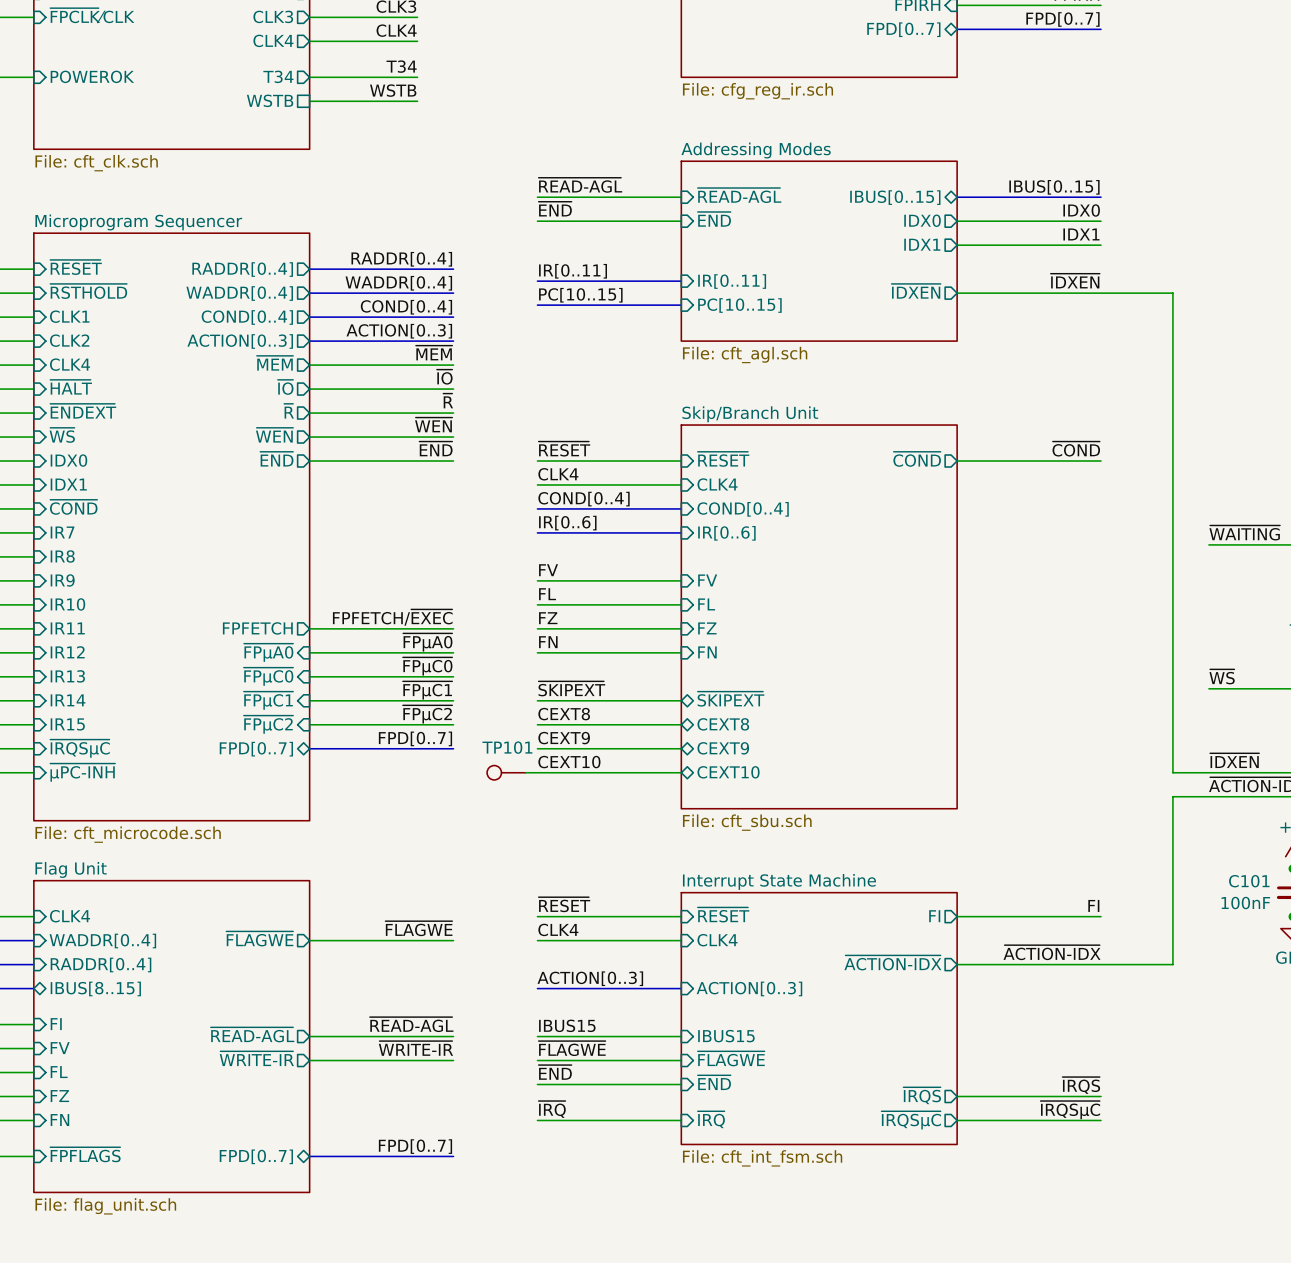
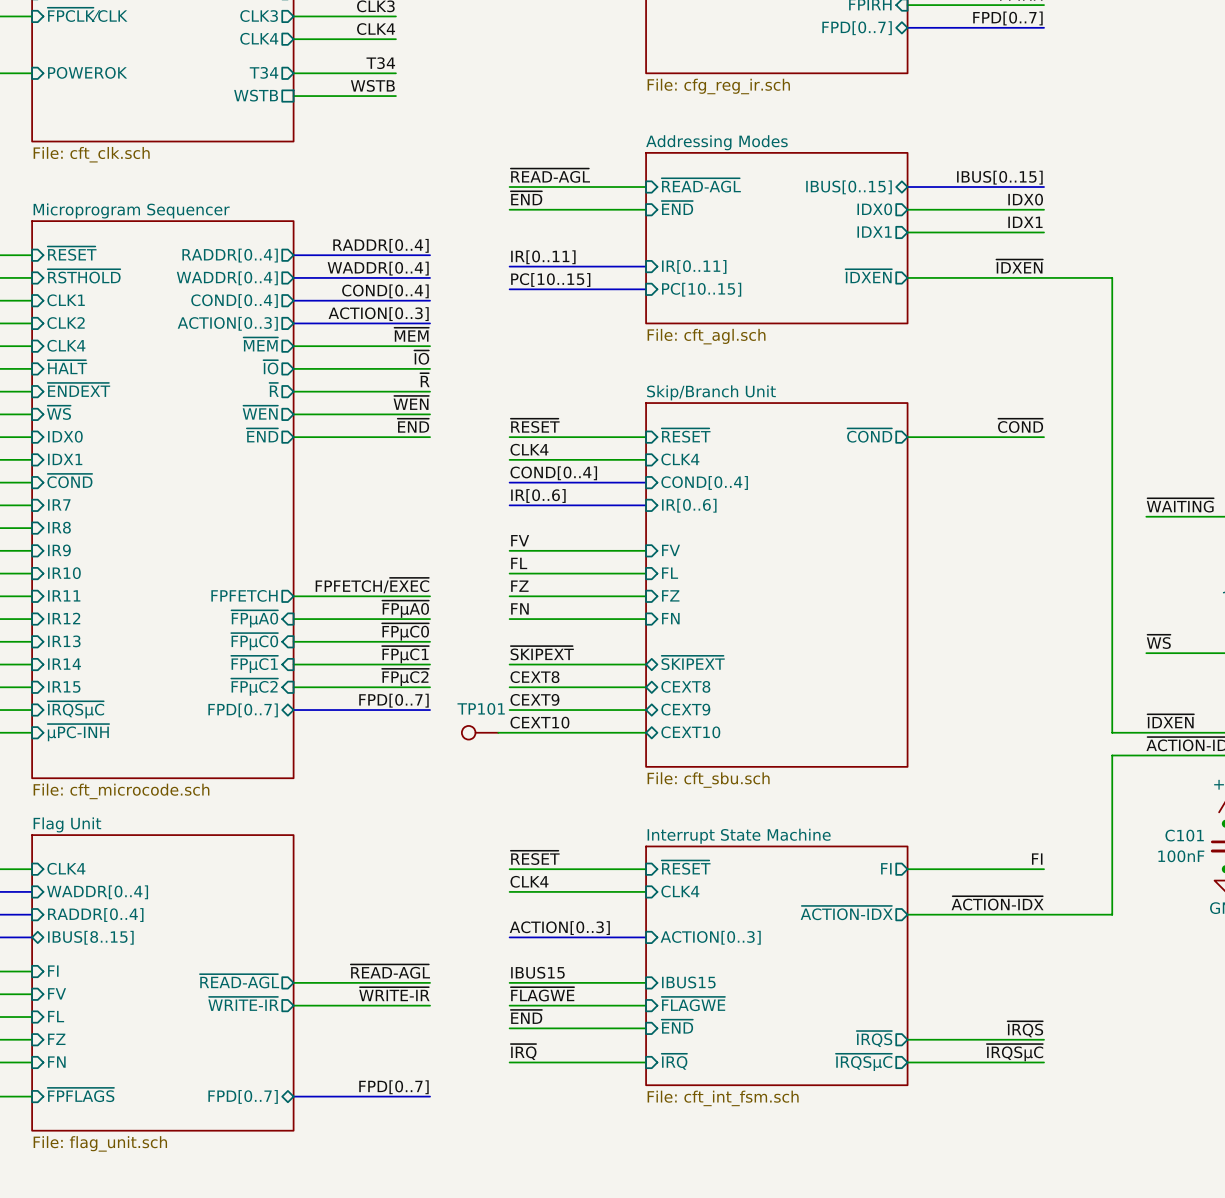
label: ~{FLAGWE} (418, 928) -> none
sheet pin: ~{FLAGWE} (259, 938) -> none
wire: (309, 940) (453, 940) -> none

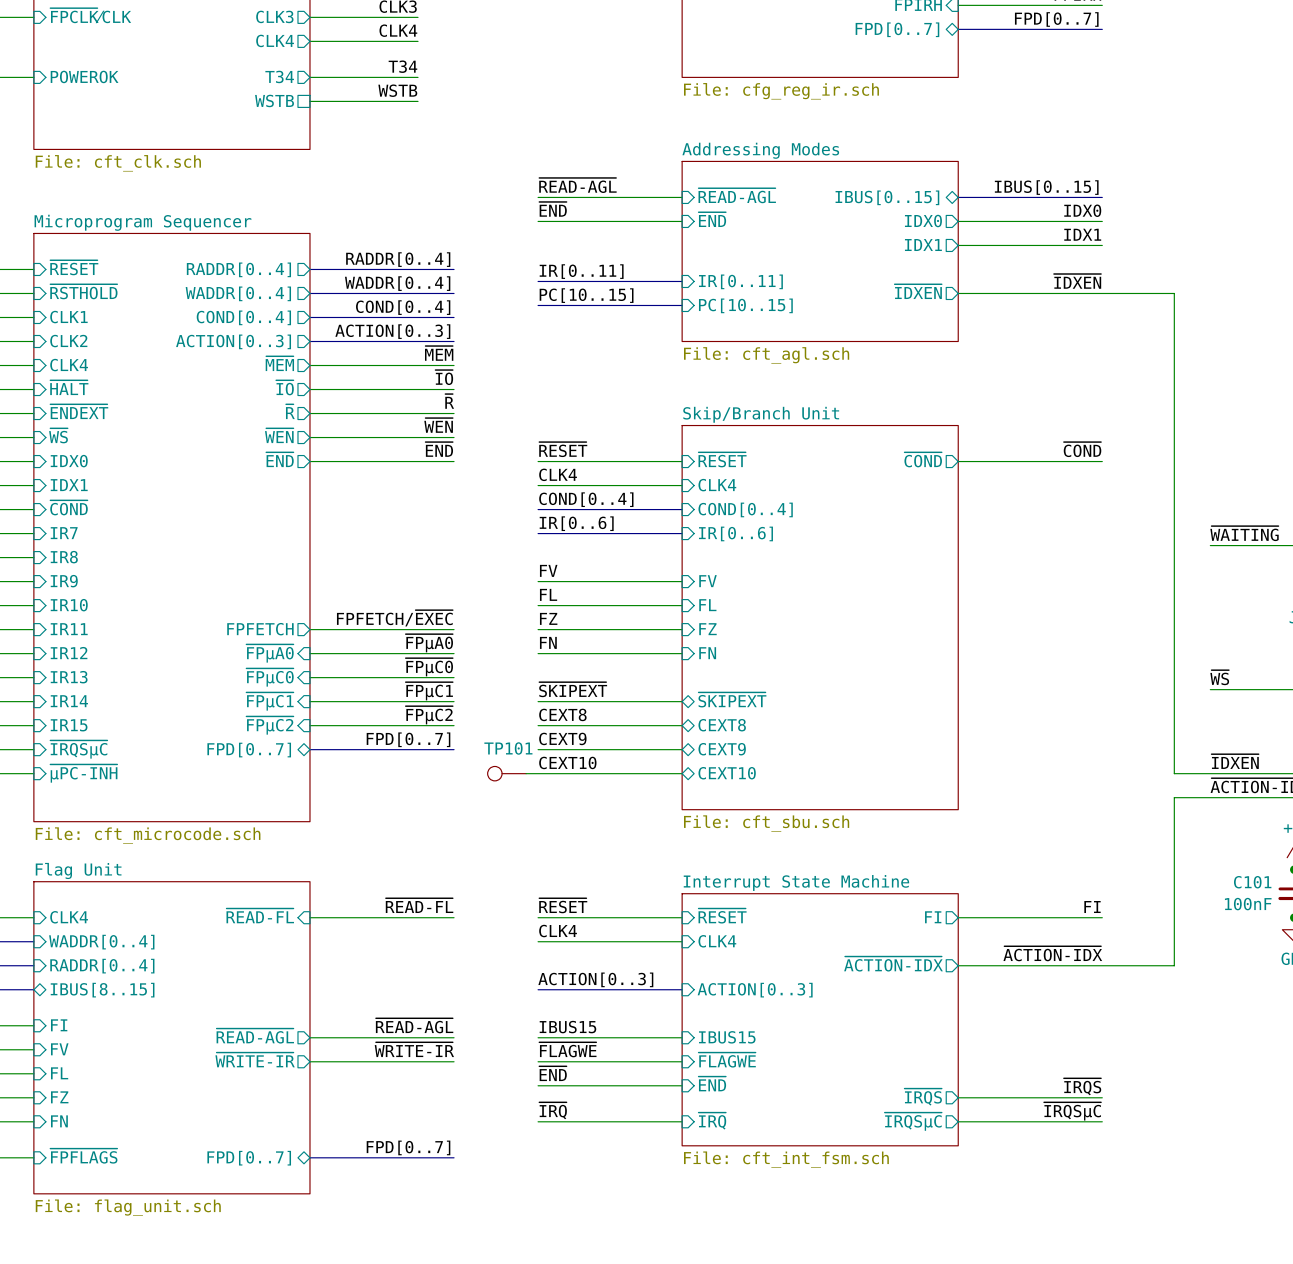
label: none -> ~{READ-FL} (419, 905)
sheet pin: none -> ~{READ-FL} (260, 915)
wire: none -> (309, 917) (454, 917)

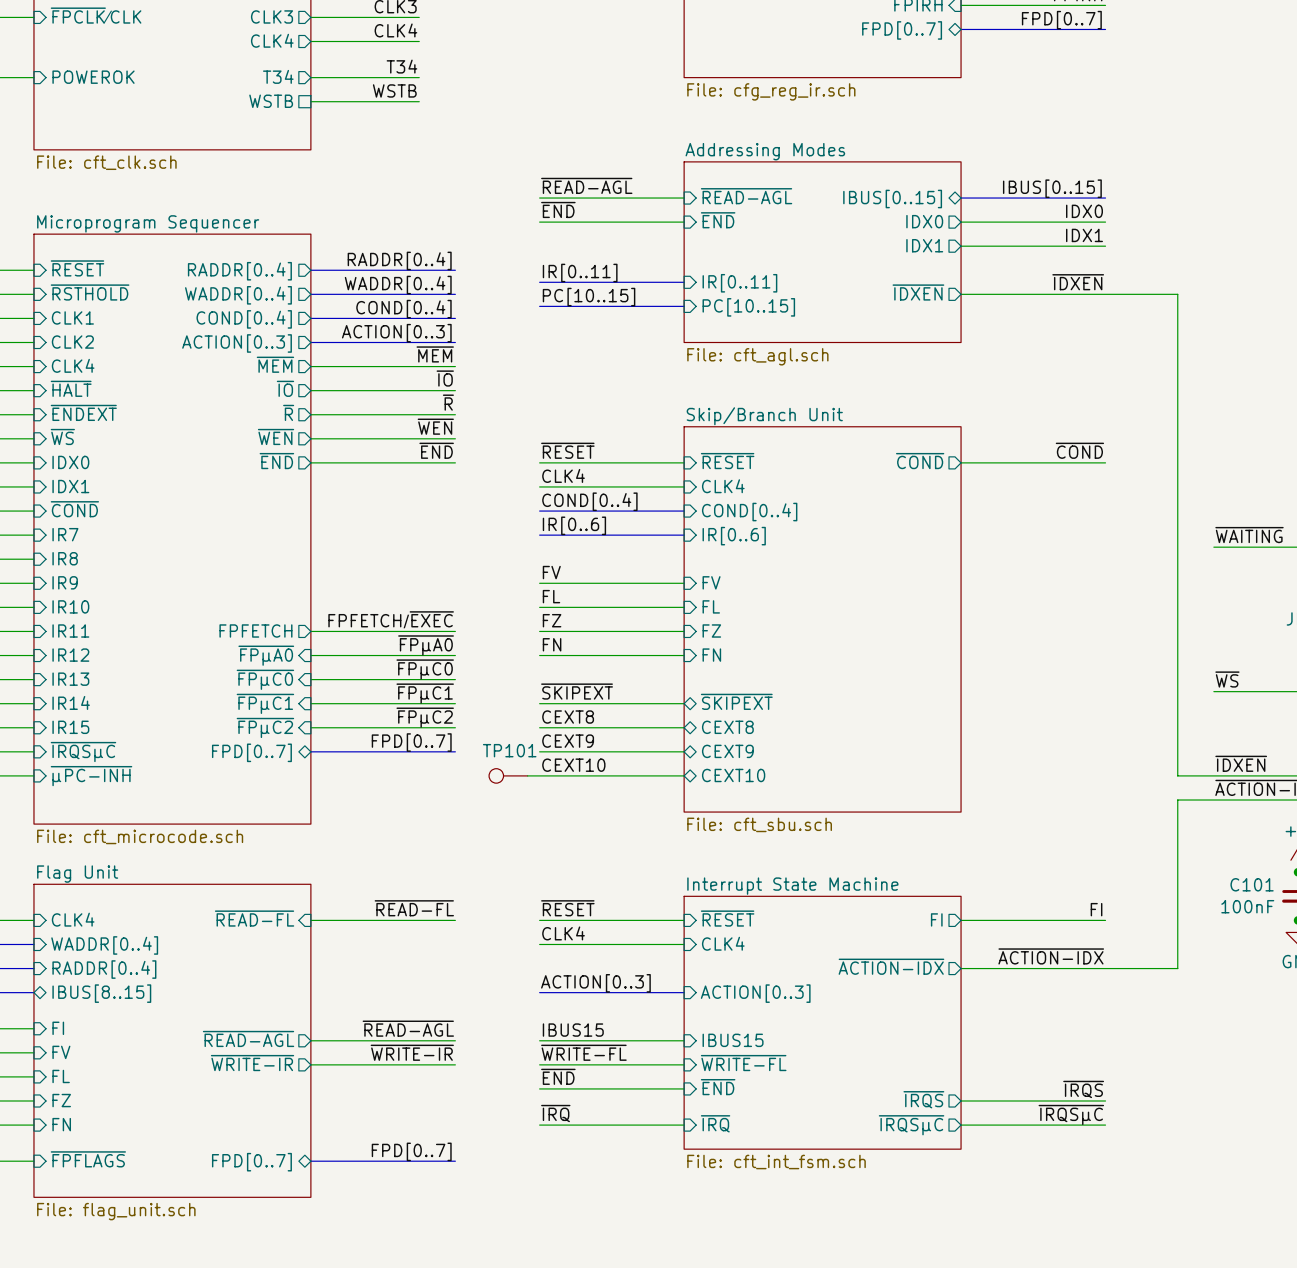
label: ~{FLAGWE} (567, 1049) -> ~{WRITE-FL} (583, 1052)
sheet pin: ~{FLAGWE} (727, 1060) -> ~{WRITE-FL} (743, 1063)

